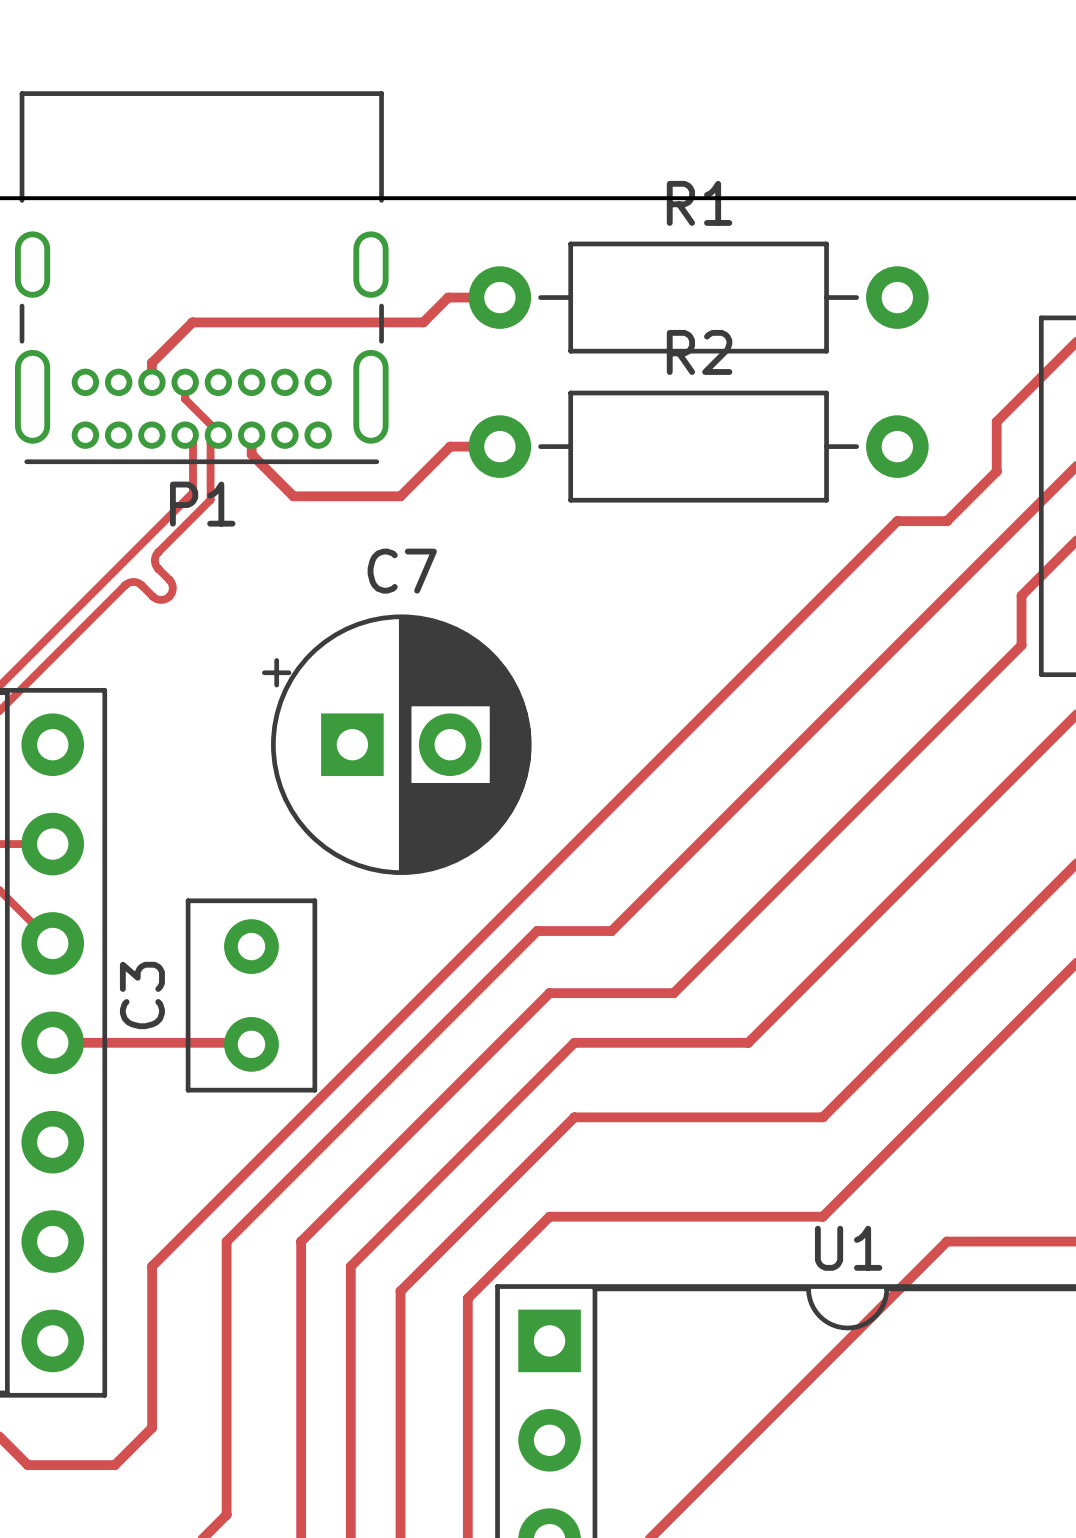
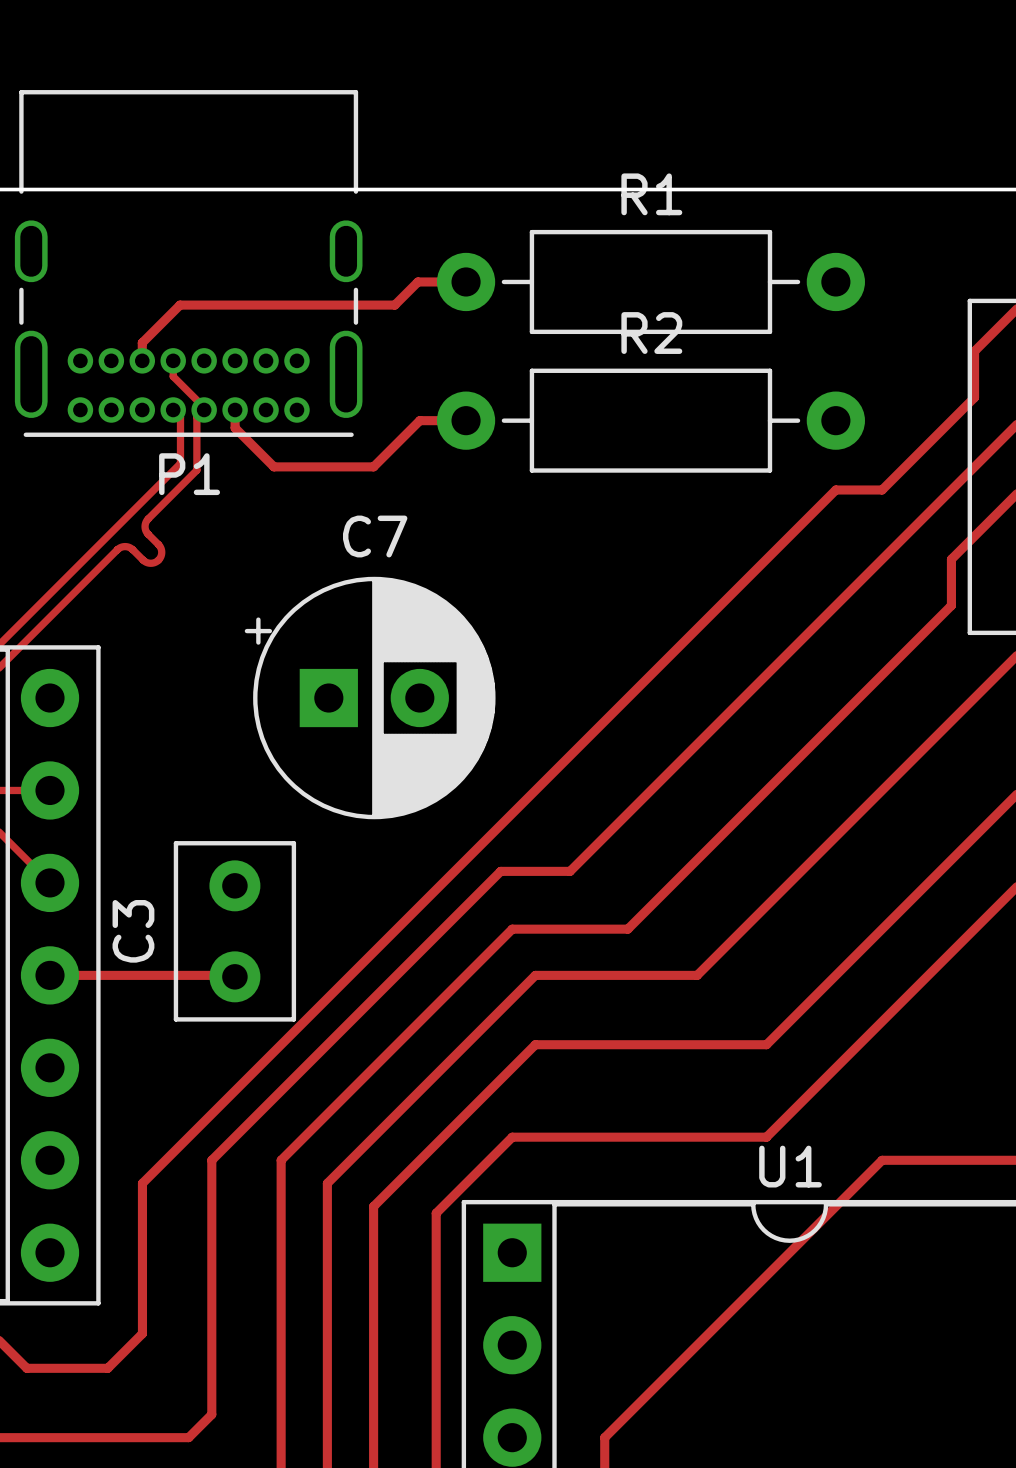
track: (1046, 372) (996, 421) (996, 471) -> (974, 351) (974, 397) (928, 443)

